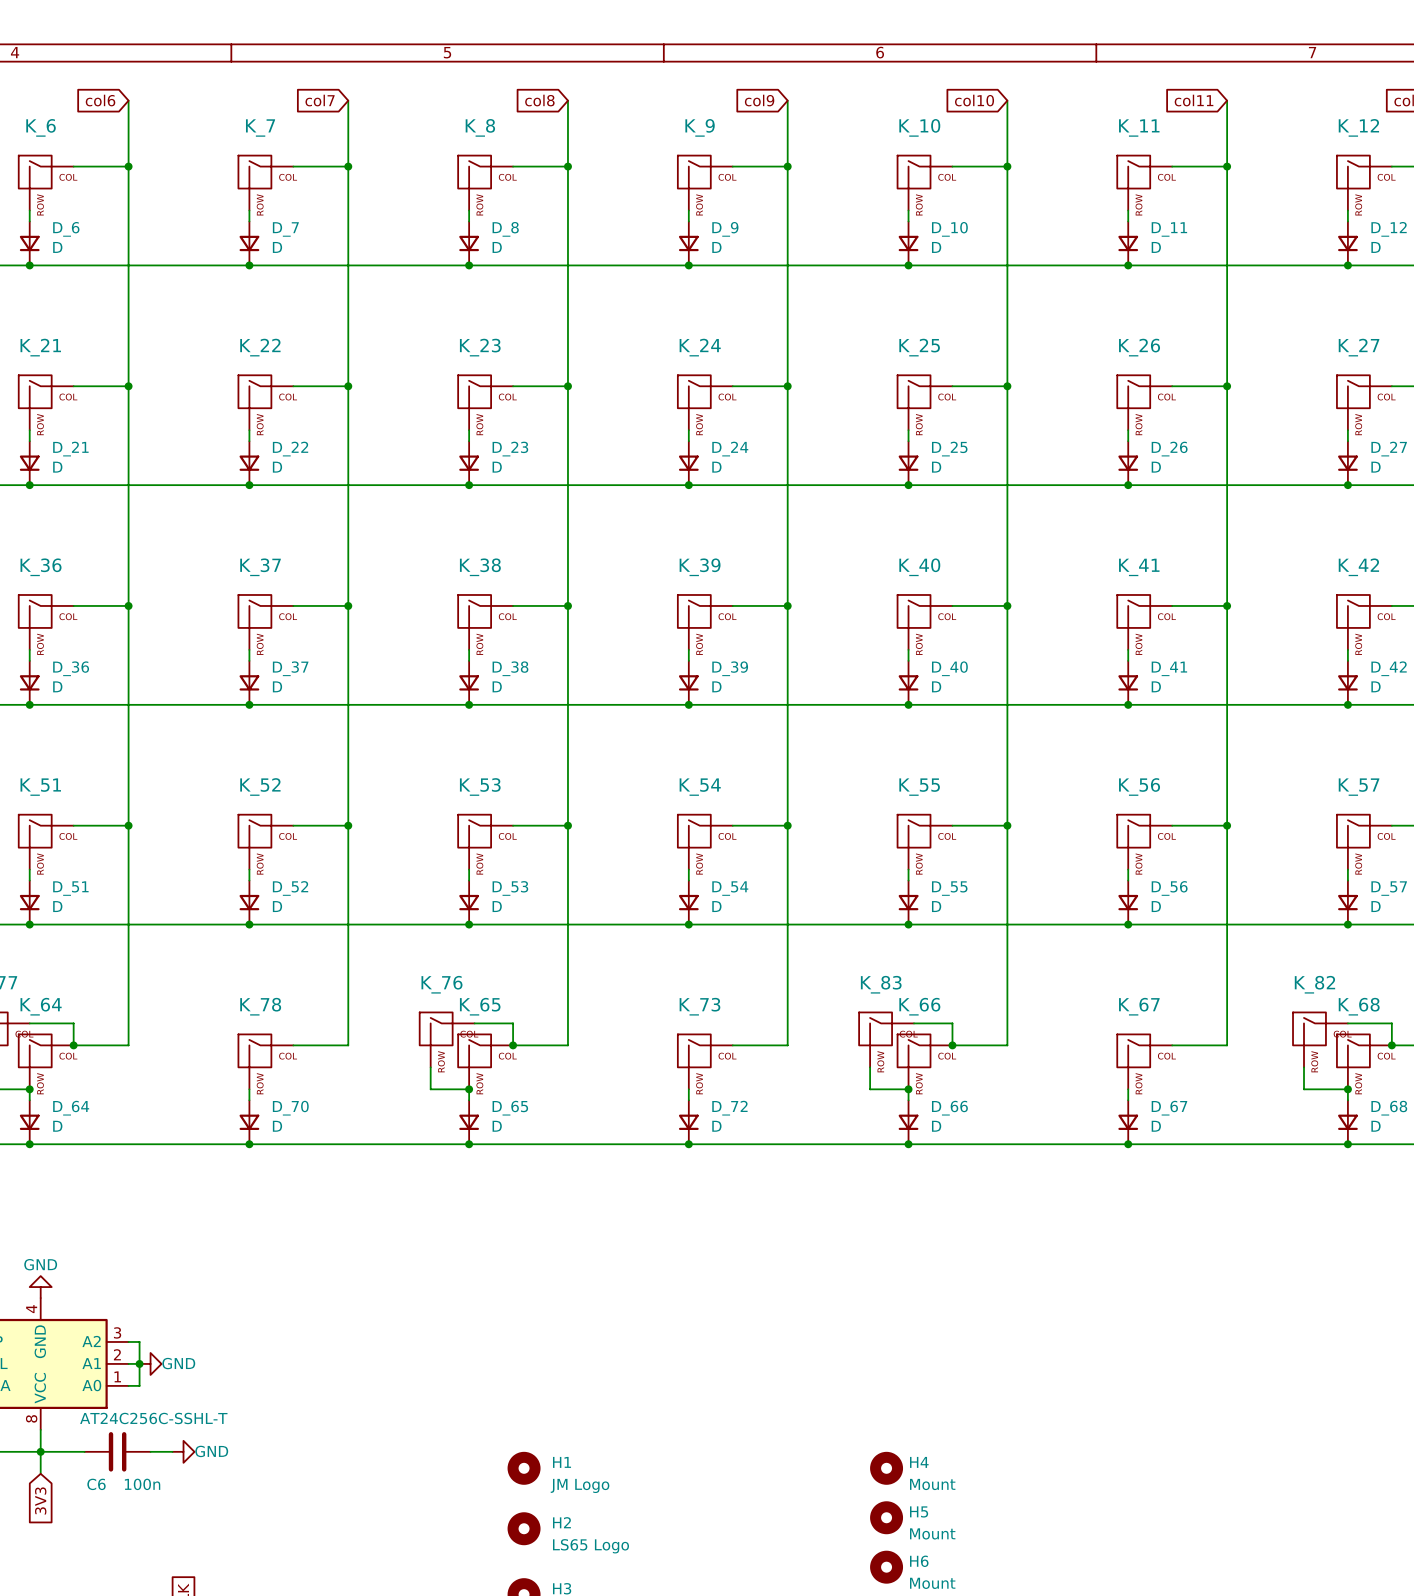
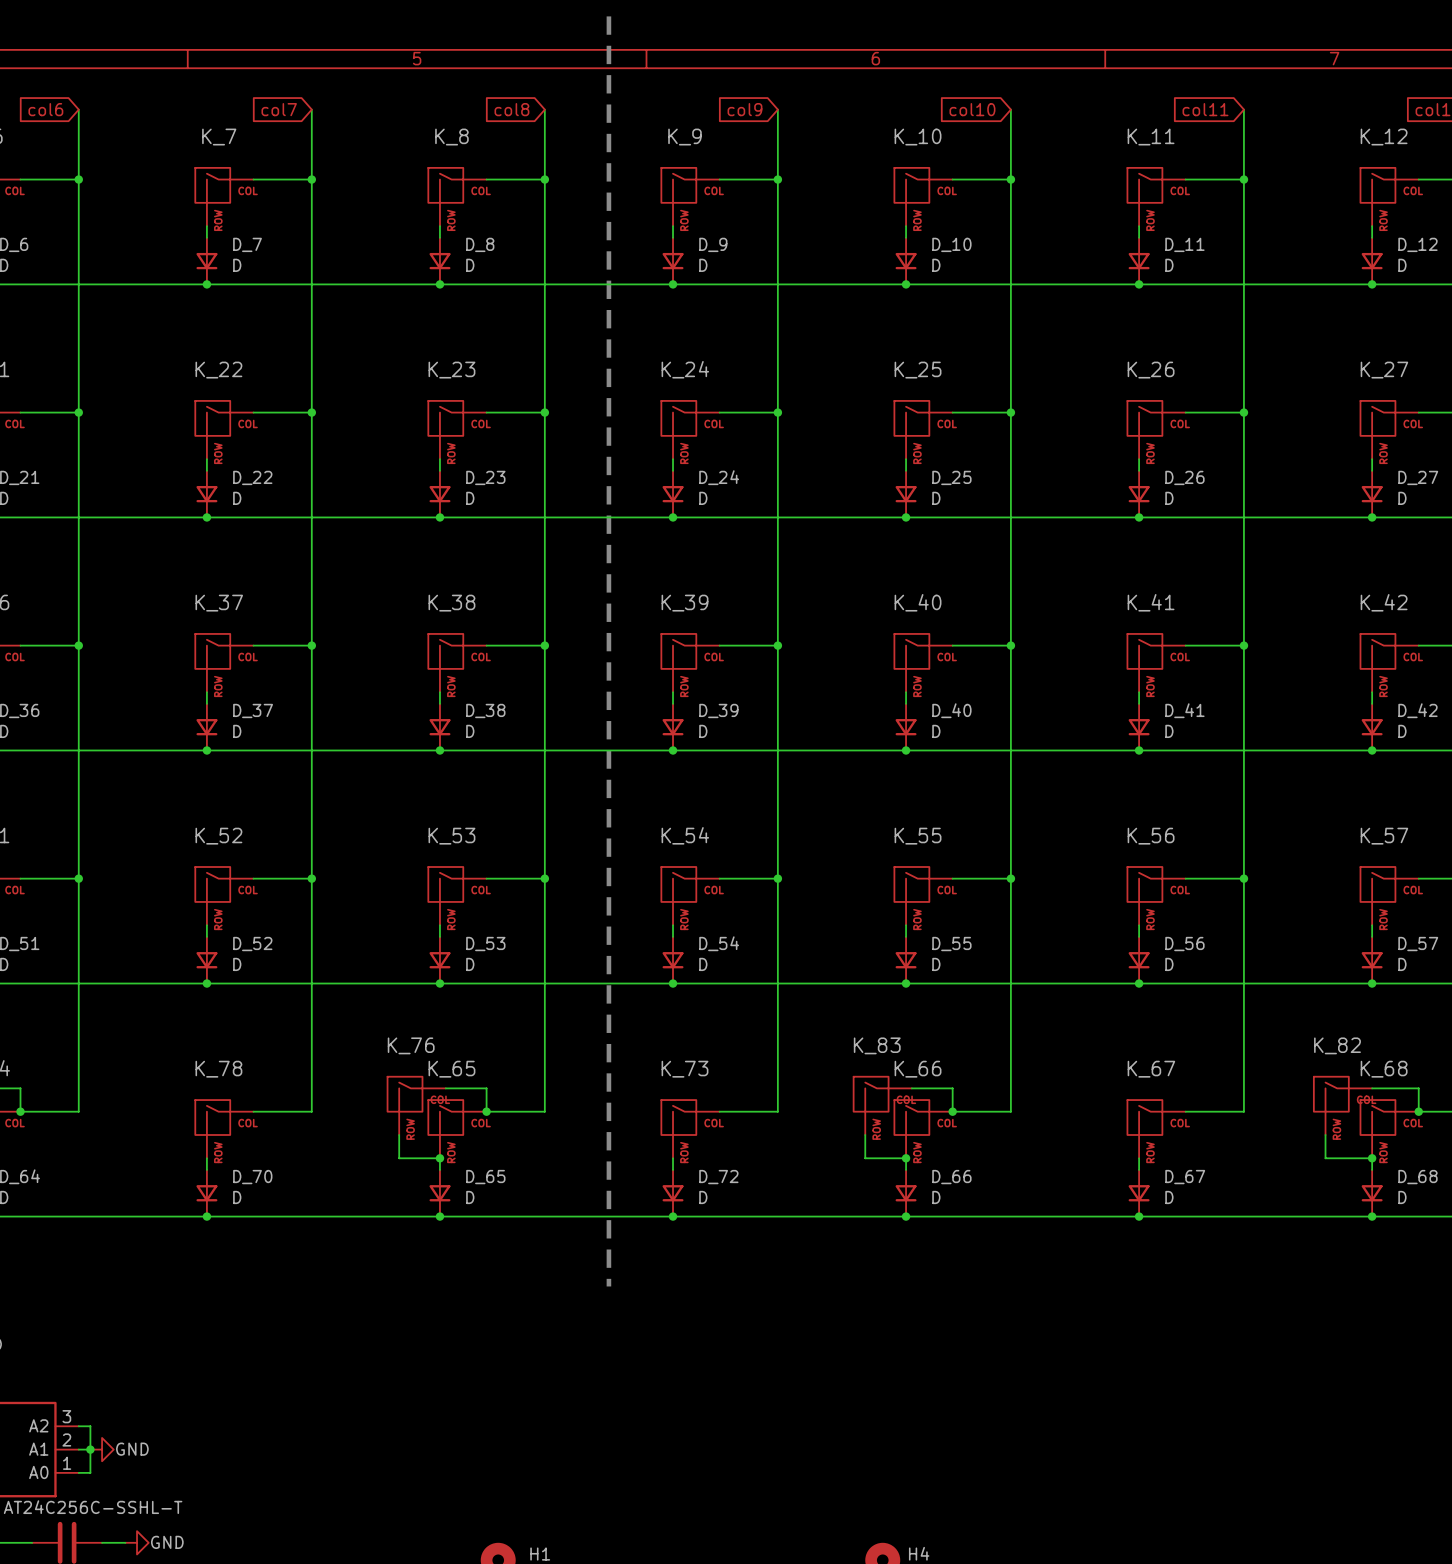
line: none -> (608, 16) (608, 1286)

